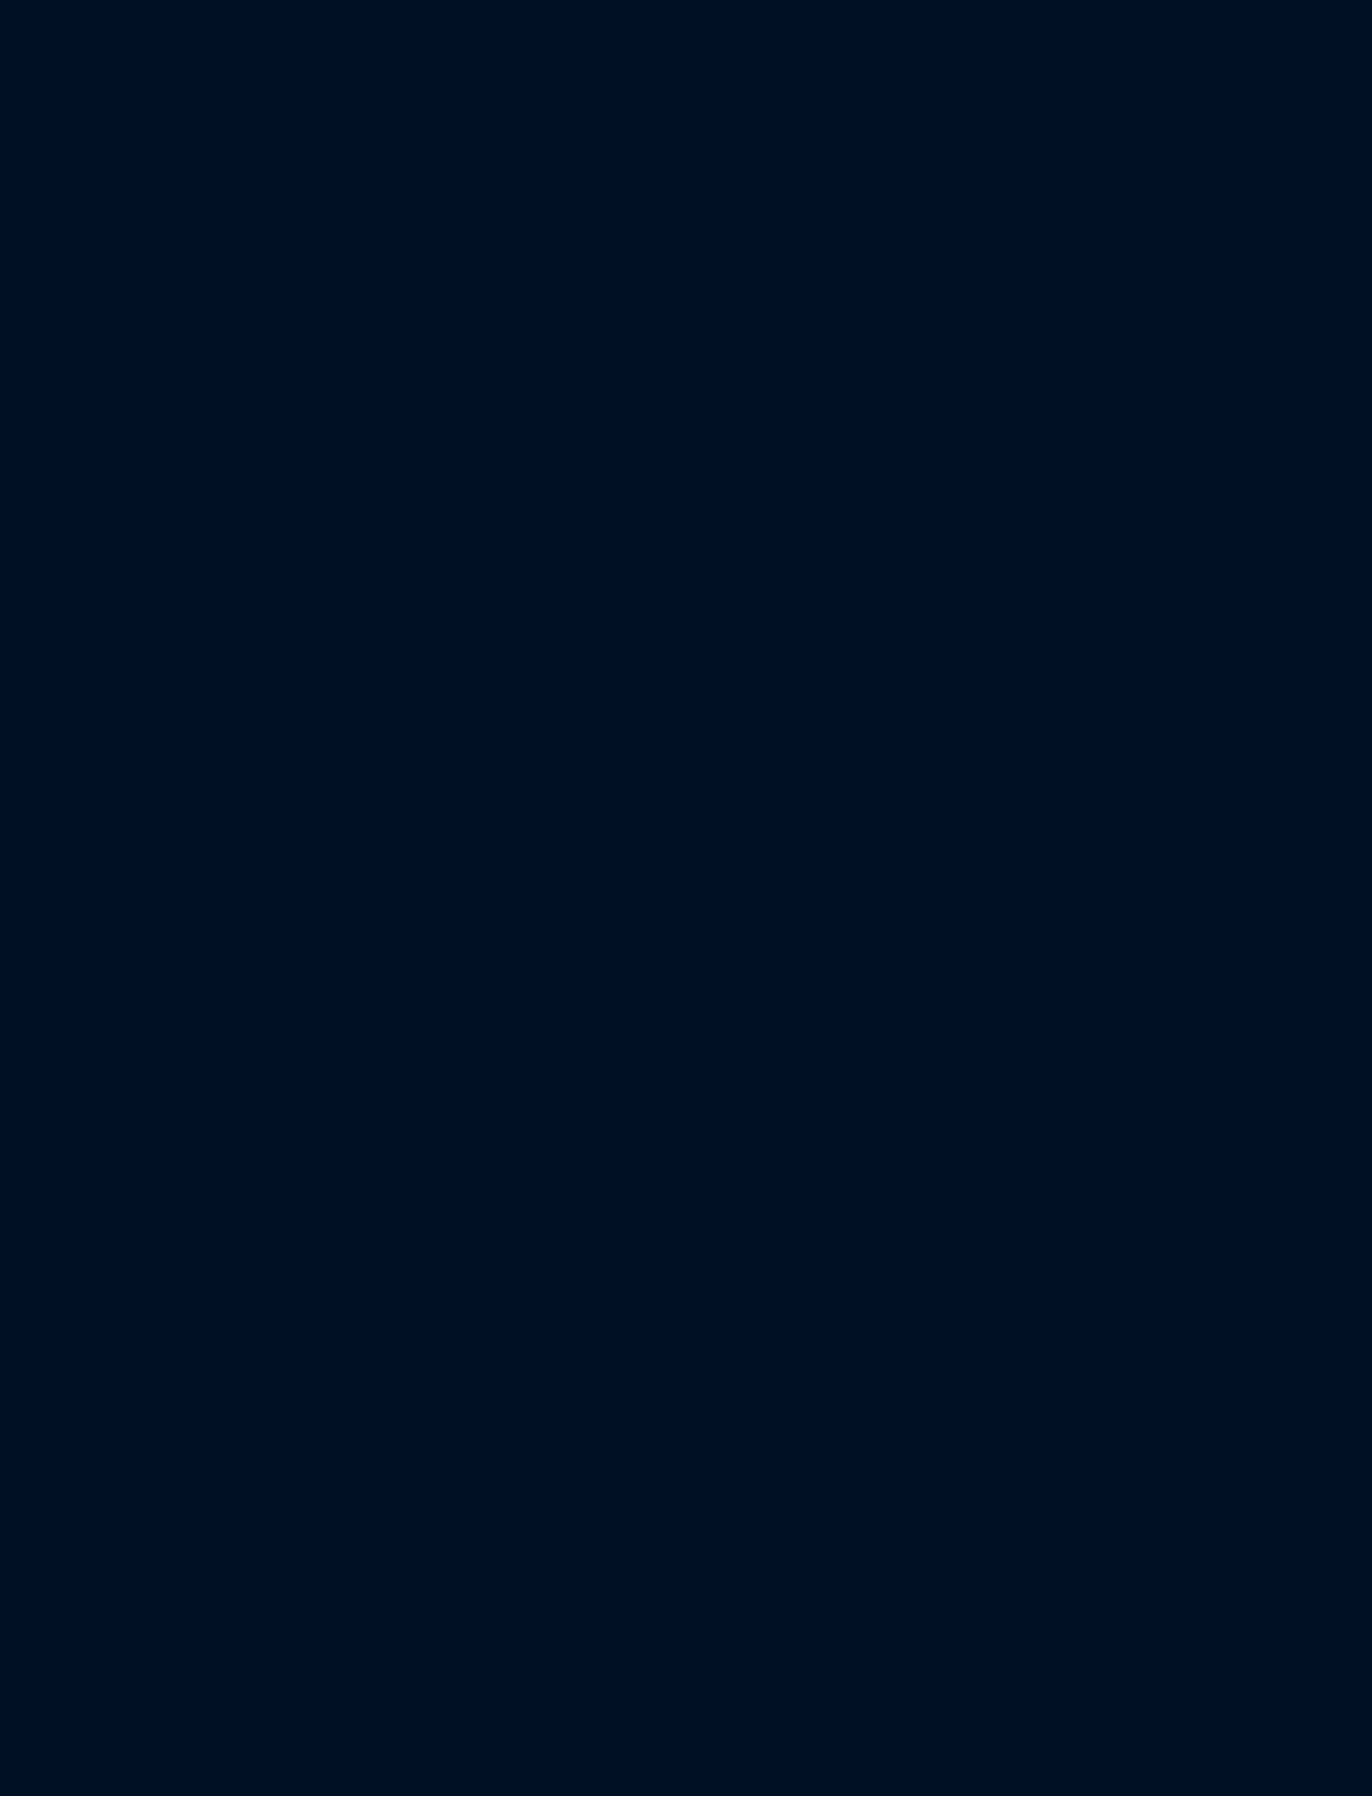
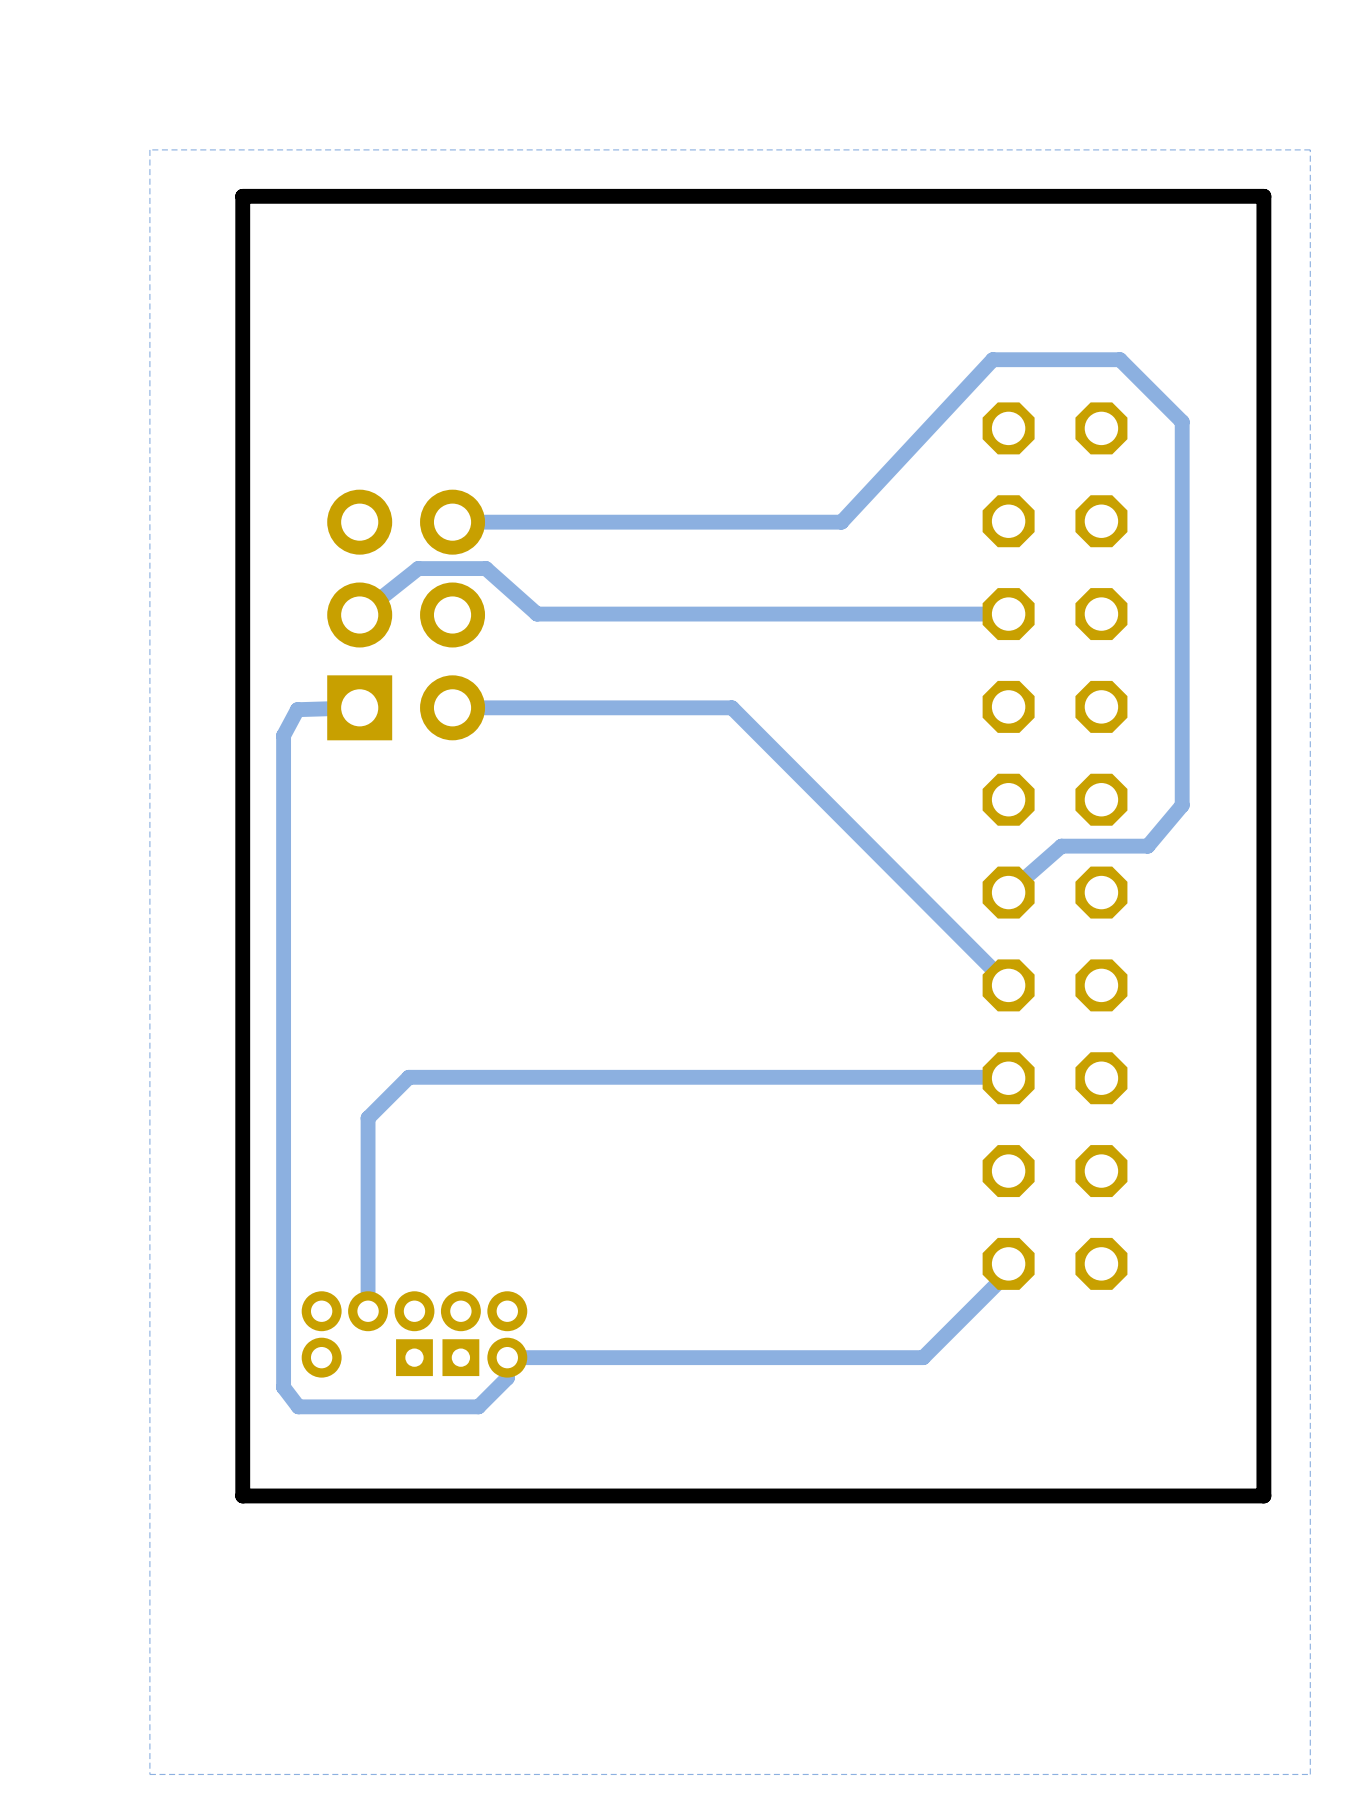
zone outline: none -> (1310, 149) (149, 149) (149, 1774) (1310, 1774) (1310, 149)
board edge: none -> (1263, 196) (1263, 1495) (242, 1495) (242, 196) (1263, 196)
track: none -> (452, 522) (841, 522) (992, 359) (1120, 359) (1182, 421) (1182, 805) (1147, 846) (1061, 846) (1008, 892)
part: none -> (406, 614)
track: none -> (1008, 614) (537, 614) (485, 568) (418, 568) (359, 614)
track: none -> (359, 707) (297, 709) (283, 735) (283, 1387) (298, 1406) (478, 1406) (507, 1378) (507, 1357) (923, 1357) (1008, 1272) (1008, 1263)
track: none -> (452, 707) (731, 707) (1008, 985)
part: none -> (1055, 846)
track: none -> (1008, 1078) (408, 1077) (368, 1118) (368, 1311)
part: none -> (414, 1334)

